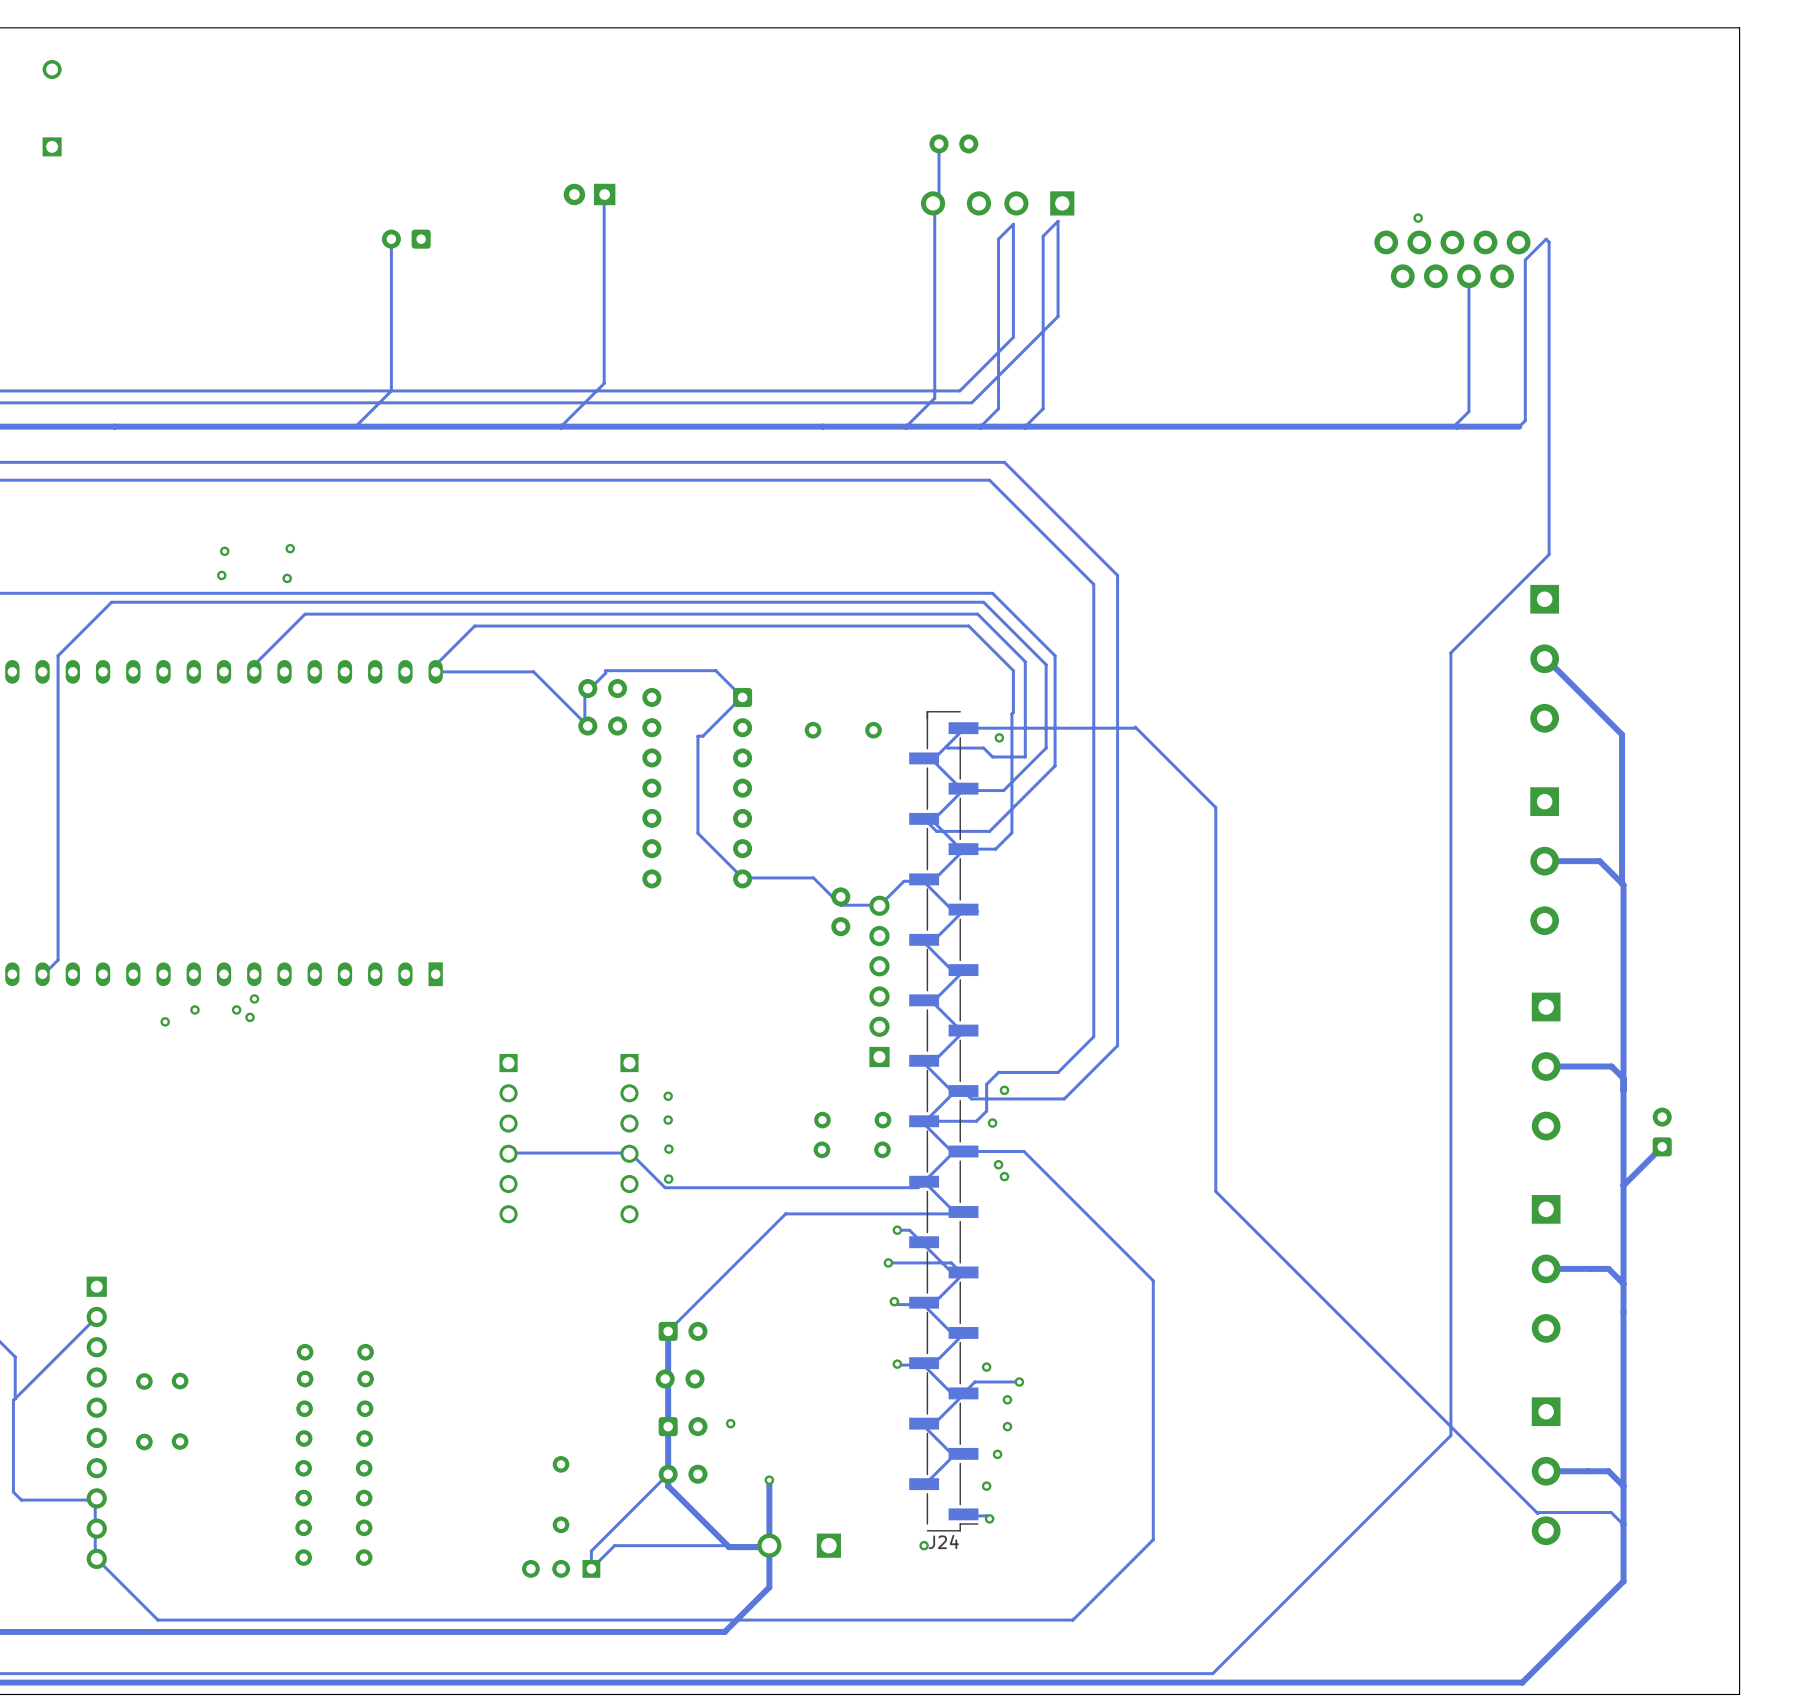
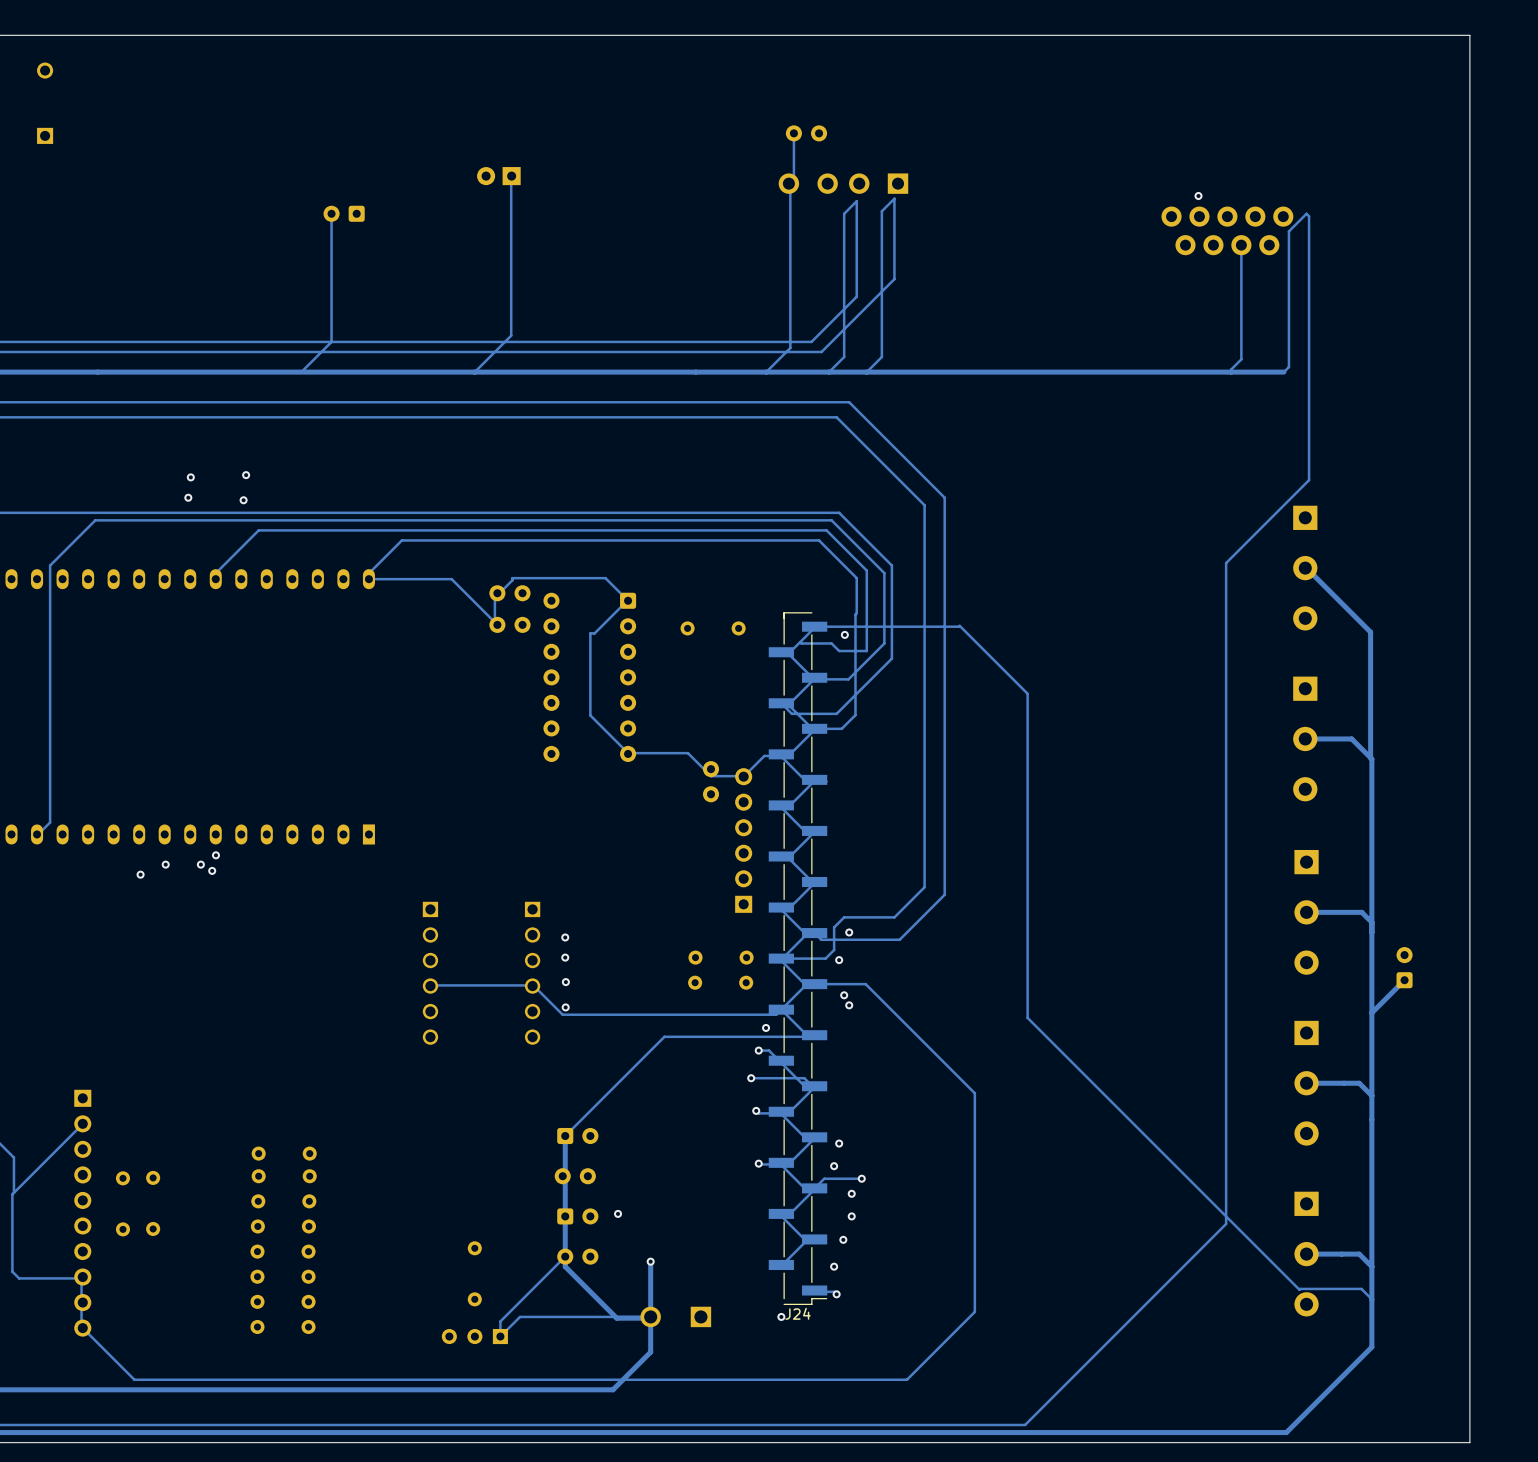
via: none -> (766, 1027)
via: none -> (839, 1143)

